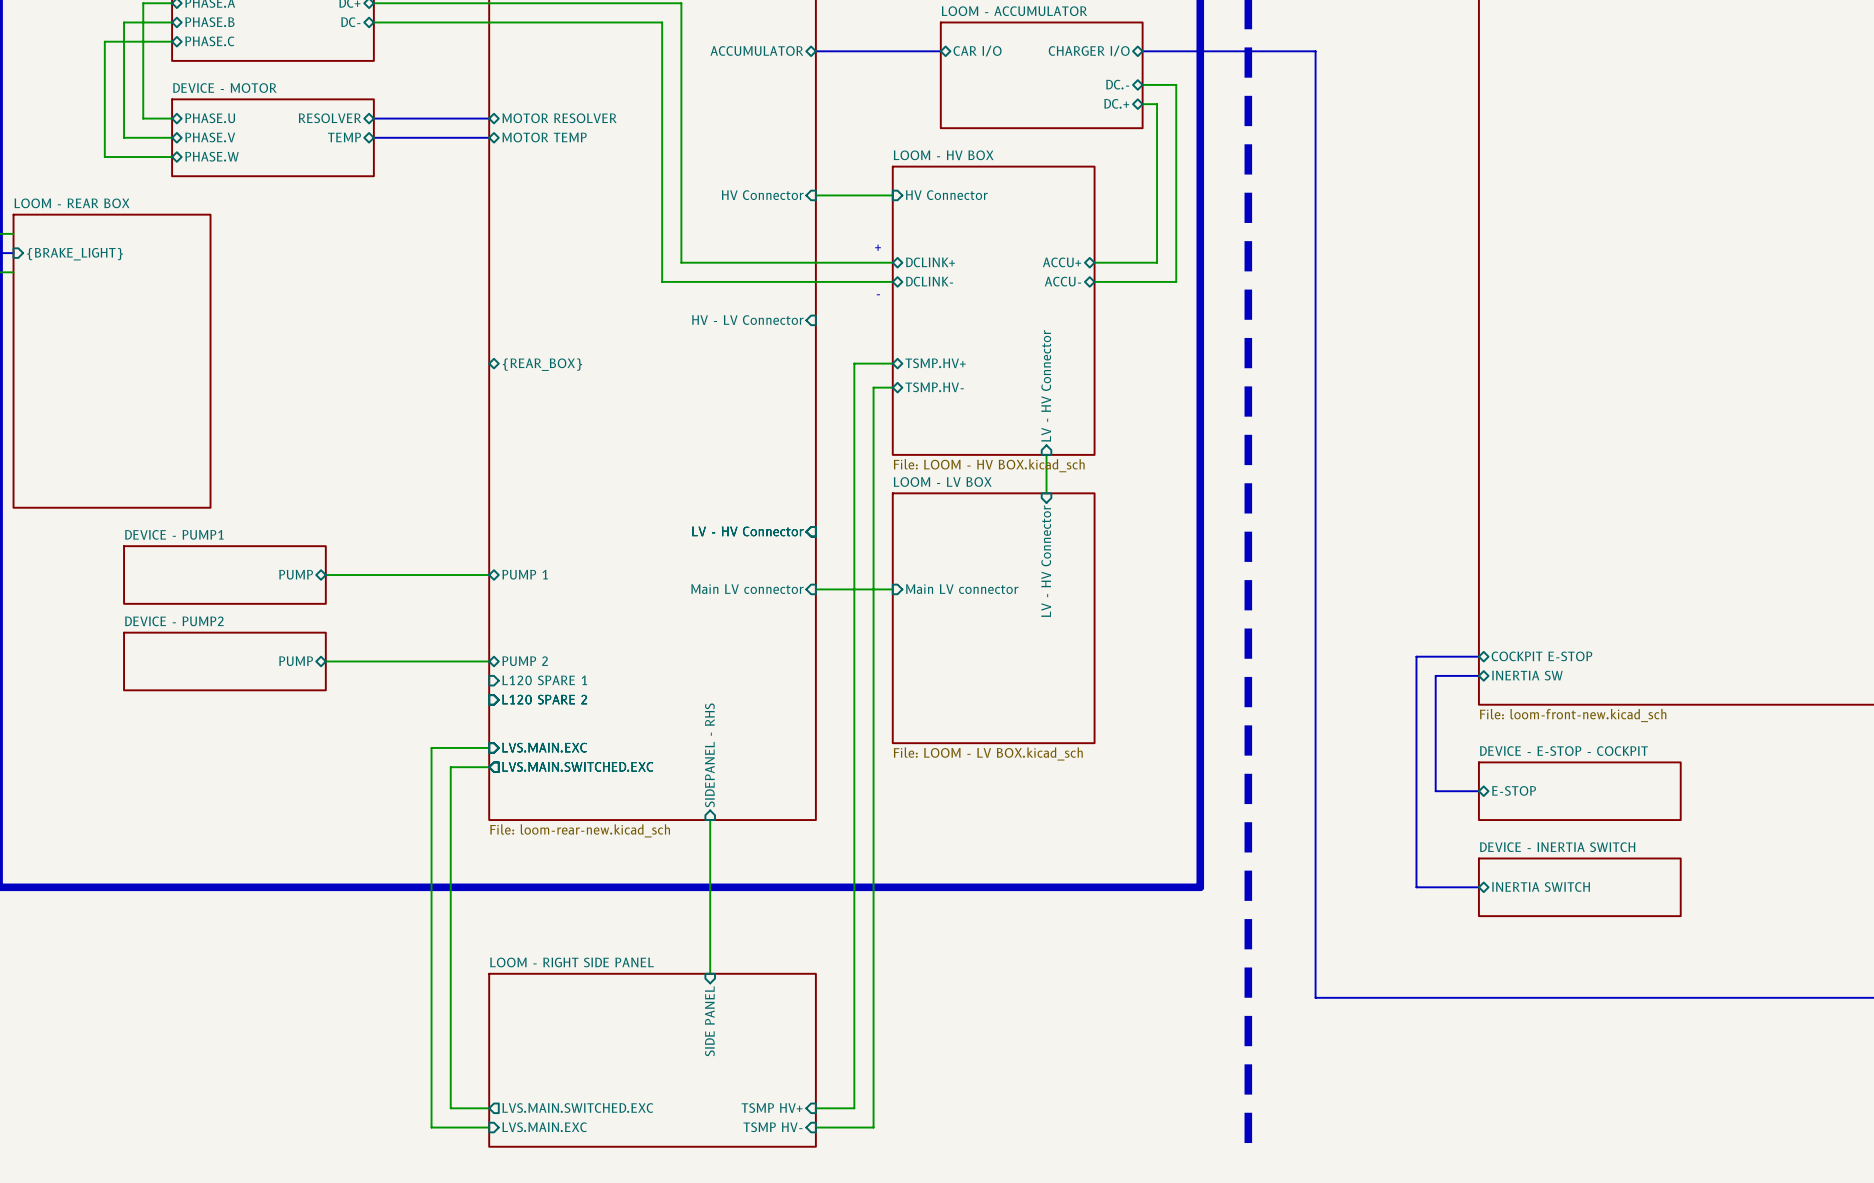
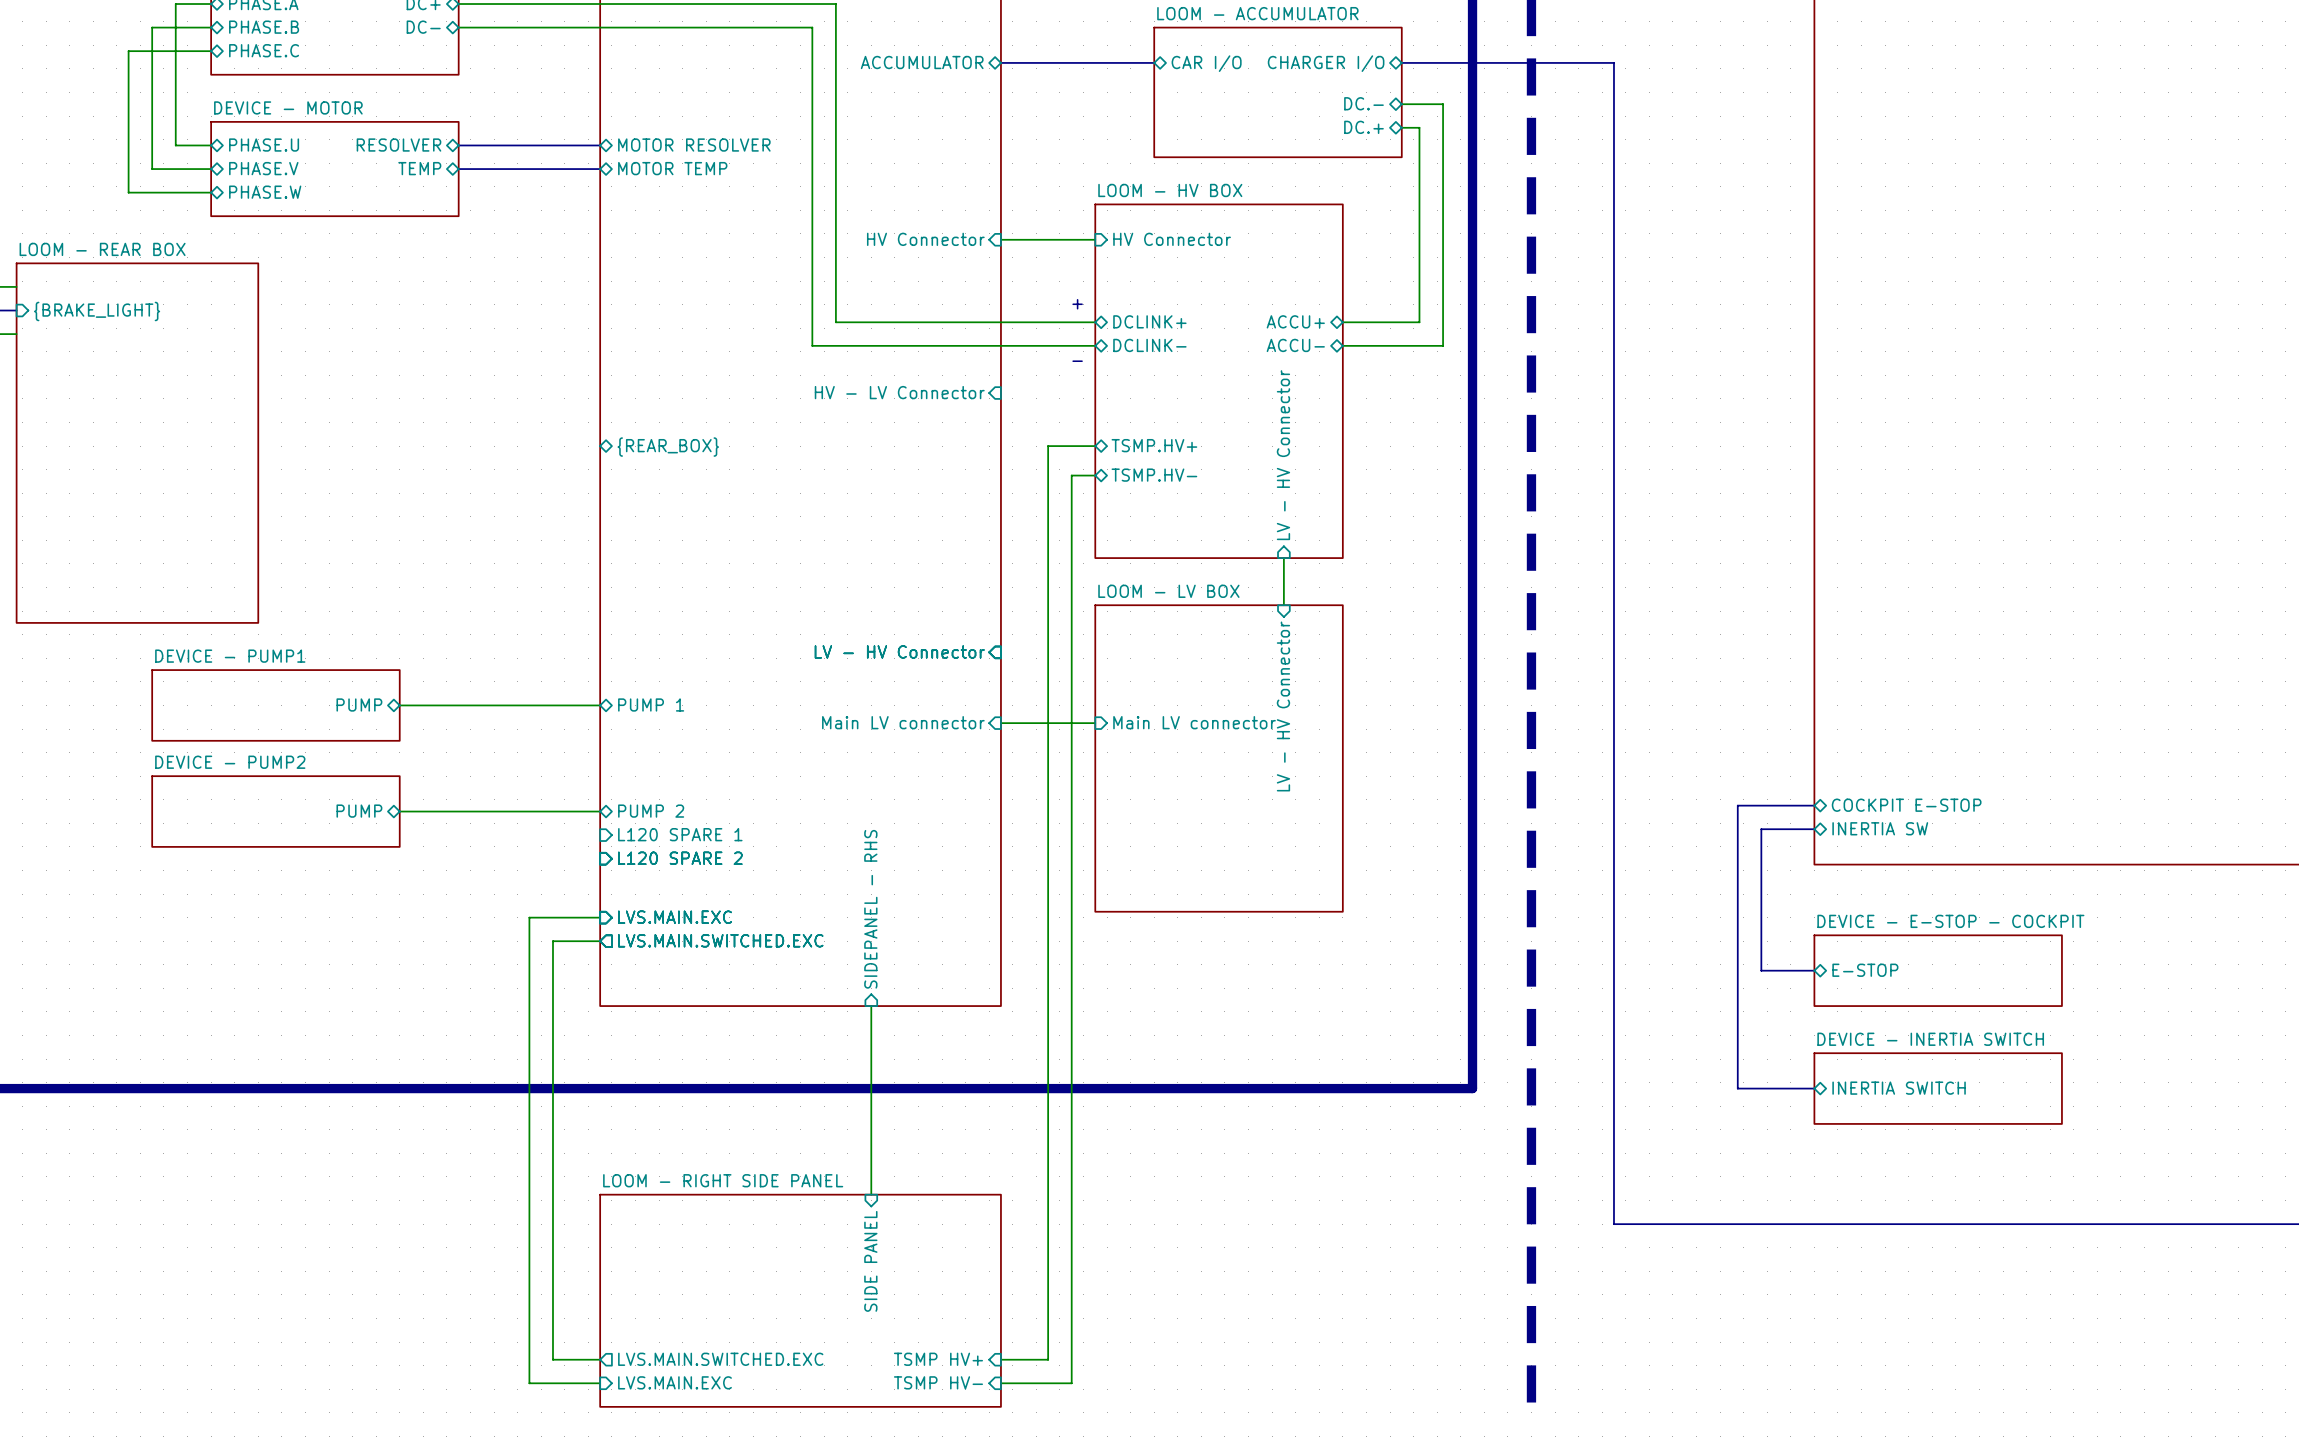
sheet LOOM - HV BOX value: File: LOOM - HV BOX.kicad_sch (989, 465) -> none
sheet value: File: loom-front-new.kicad_sch (1573, 715) -> none
sheet LOOM - LV BOX value: File: LOOM - LV BOX.kicad_sch (988, 753) -> none
sheet value: File: loom-rear-new.kicad_sch (580, 830) -> none

